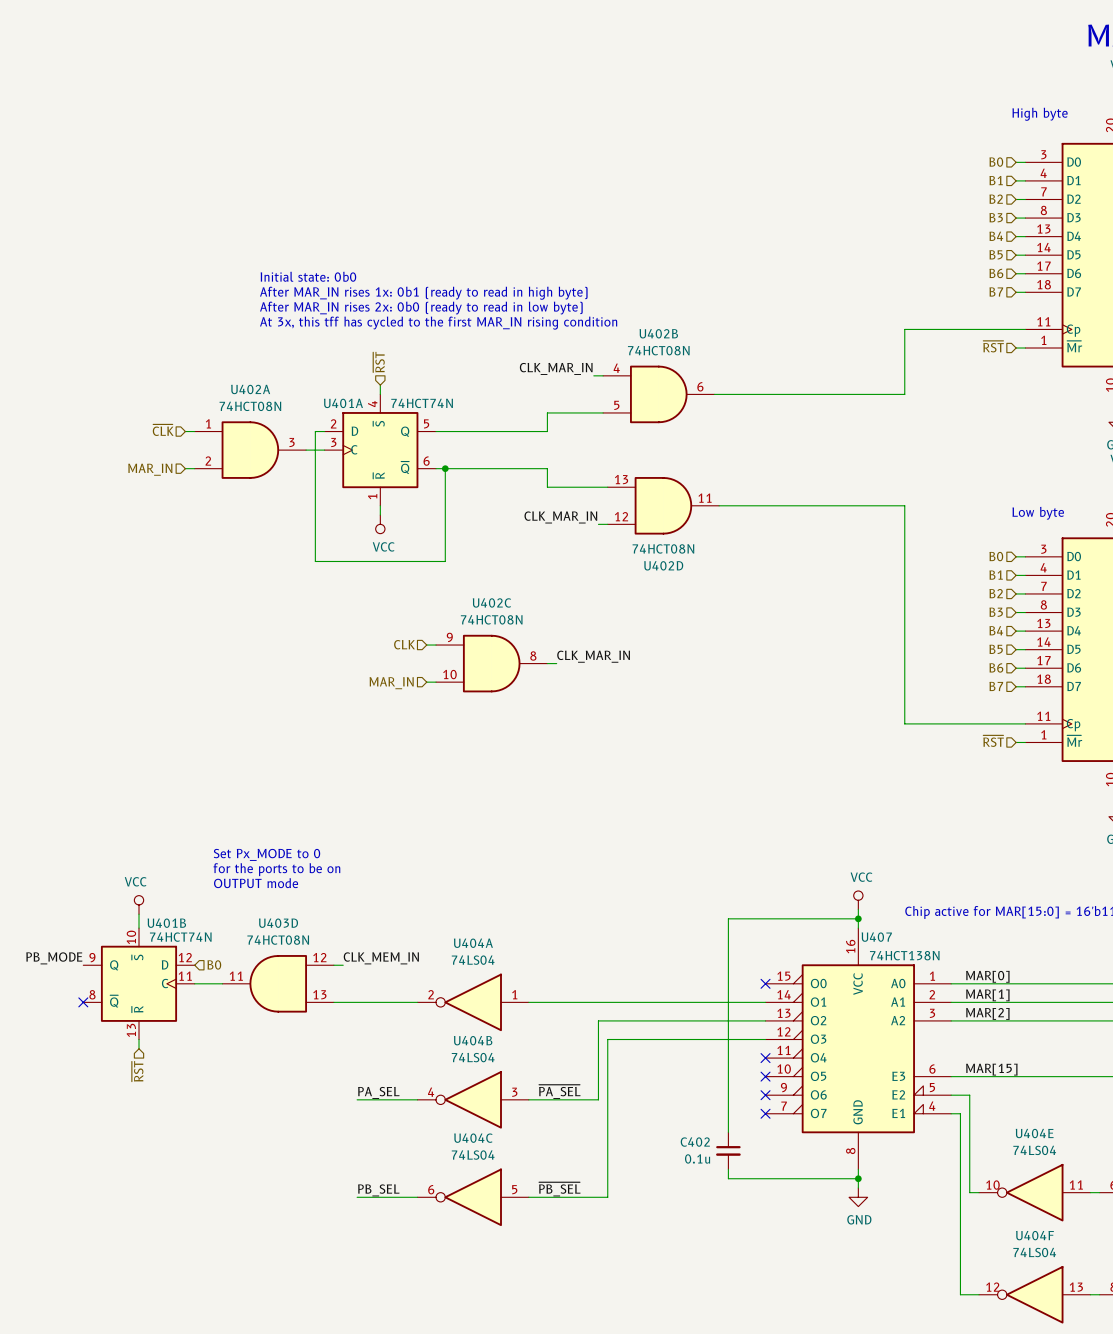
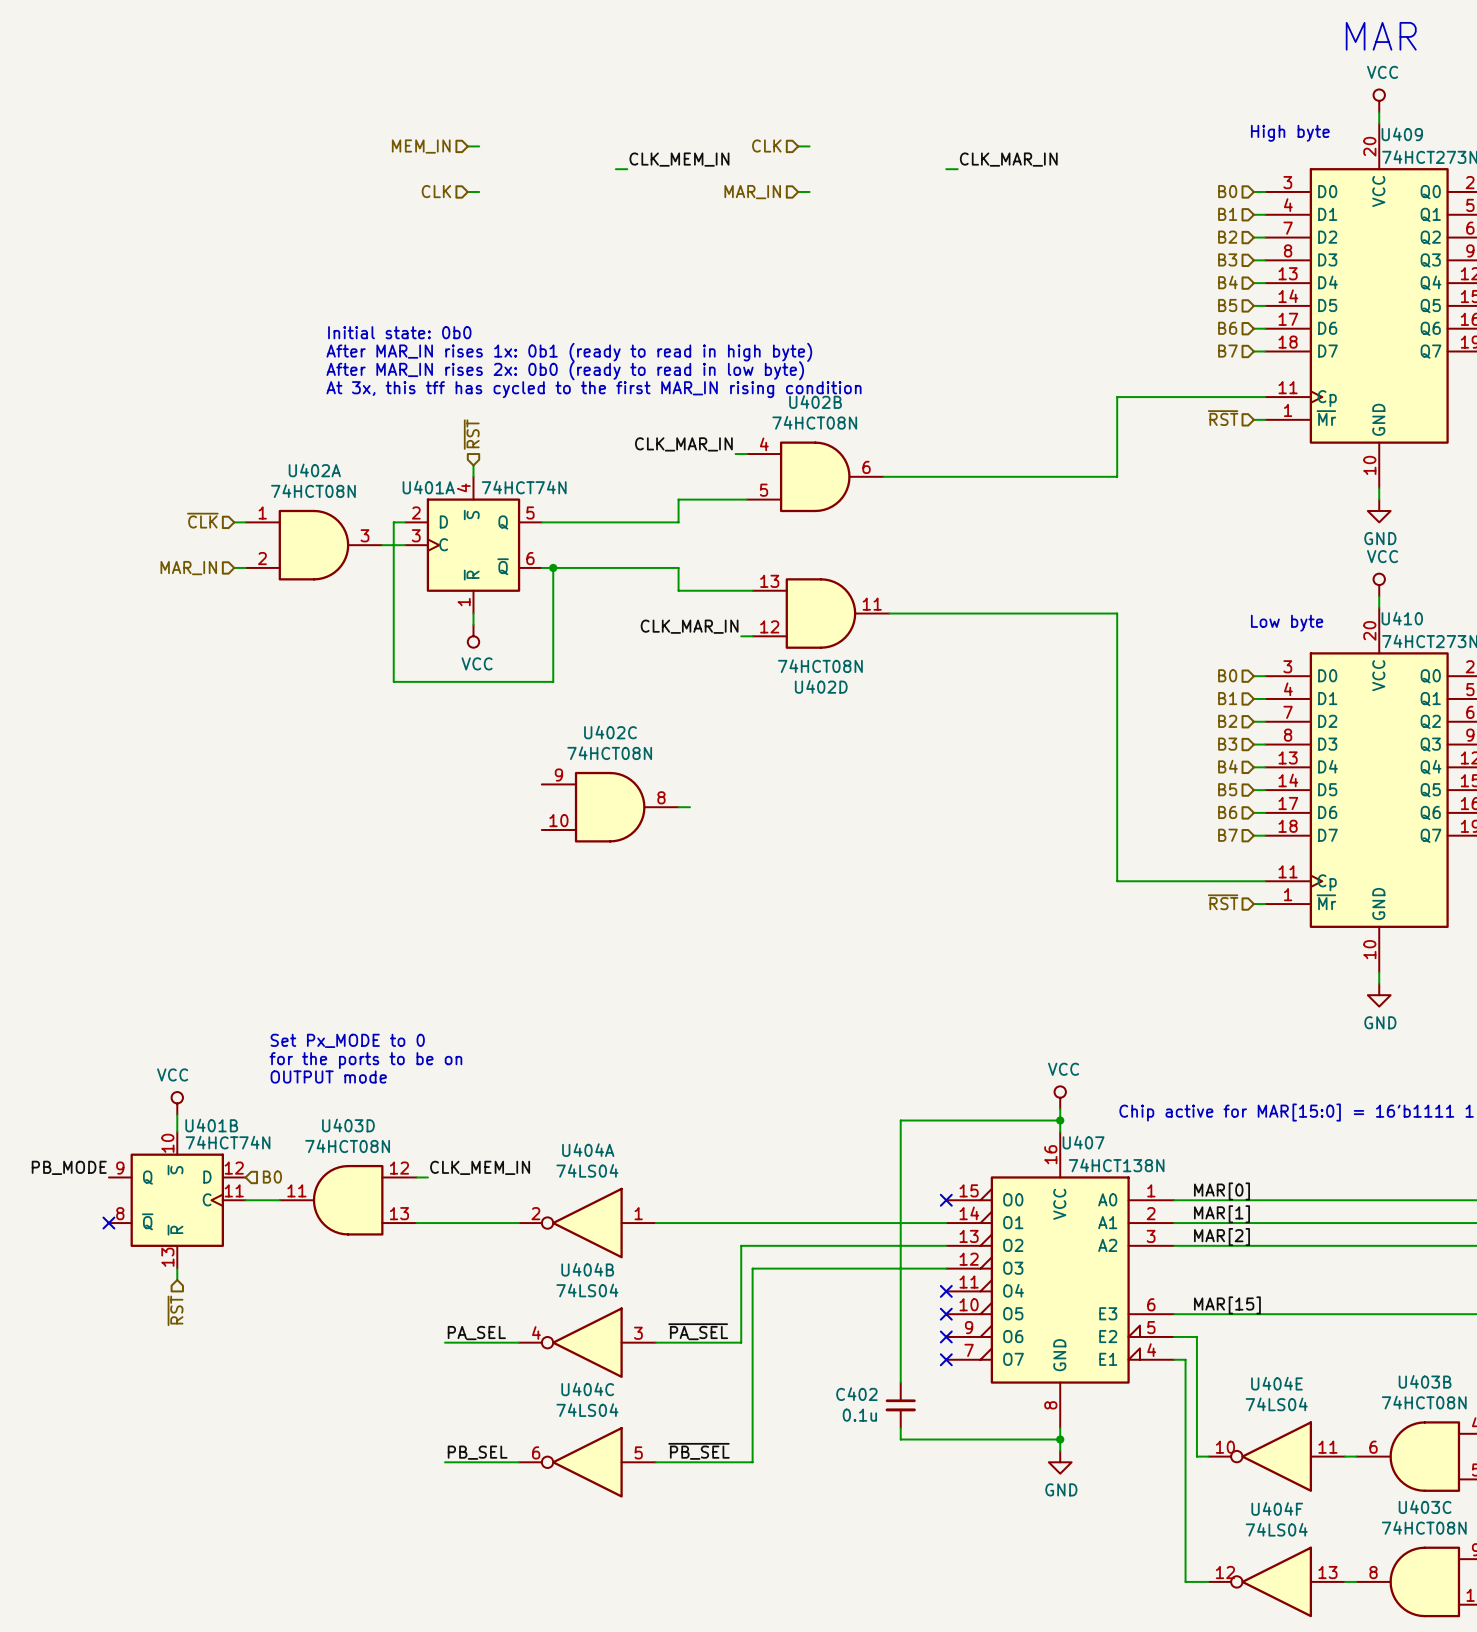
hierarchical label: none -> CLK (766, 145)
wire: none -> (467, 146) (479, 146)
wire: none -> (798, 146) (809, 146)
hierarchical label: none -> MEM_IN (421, 146)
label: none -> CLK_MEM_IN (679, 159)
label: none -> CLK_MAR_IN (1008, 159)
wire: none -> (615, 169) (627, 169)
wire: none -> (946, 169) (957, 169)
hierarchical label: none -> CLK (436, 191)
wire: none -> (467, 191) (479, 191)
wire: none -> (798, 191) (809, 191)
hierarchical label: none -> MAR_IN (752, 192)
hierarchical label: CLK (404, 644) -> none
wire: (426, 645) (436, 645) -> none
label: CLK_MAR_IN (593, 656) -> none
wire: (426, 682) (436, 682) -> none
hierarchical label: MAR_IN (391, 683) -> none

